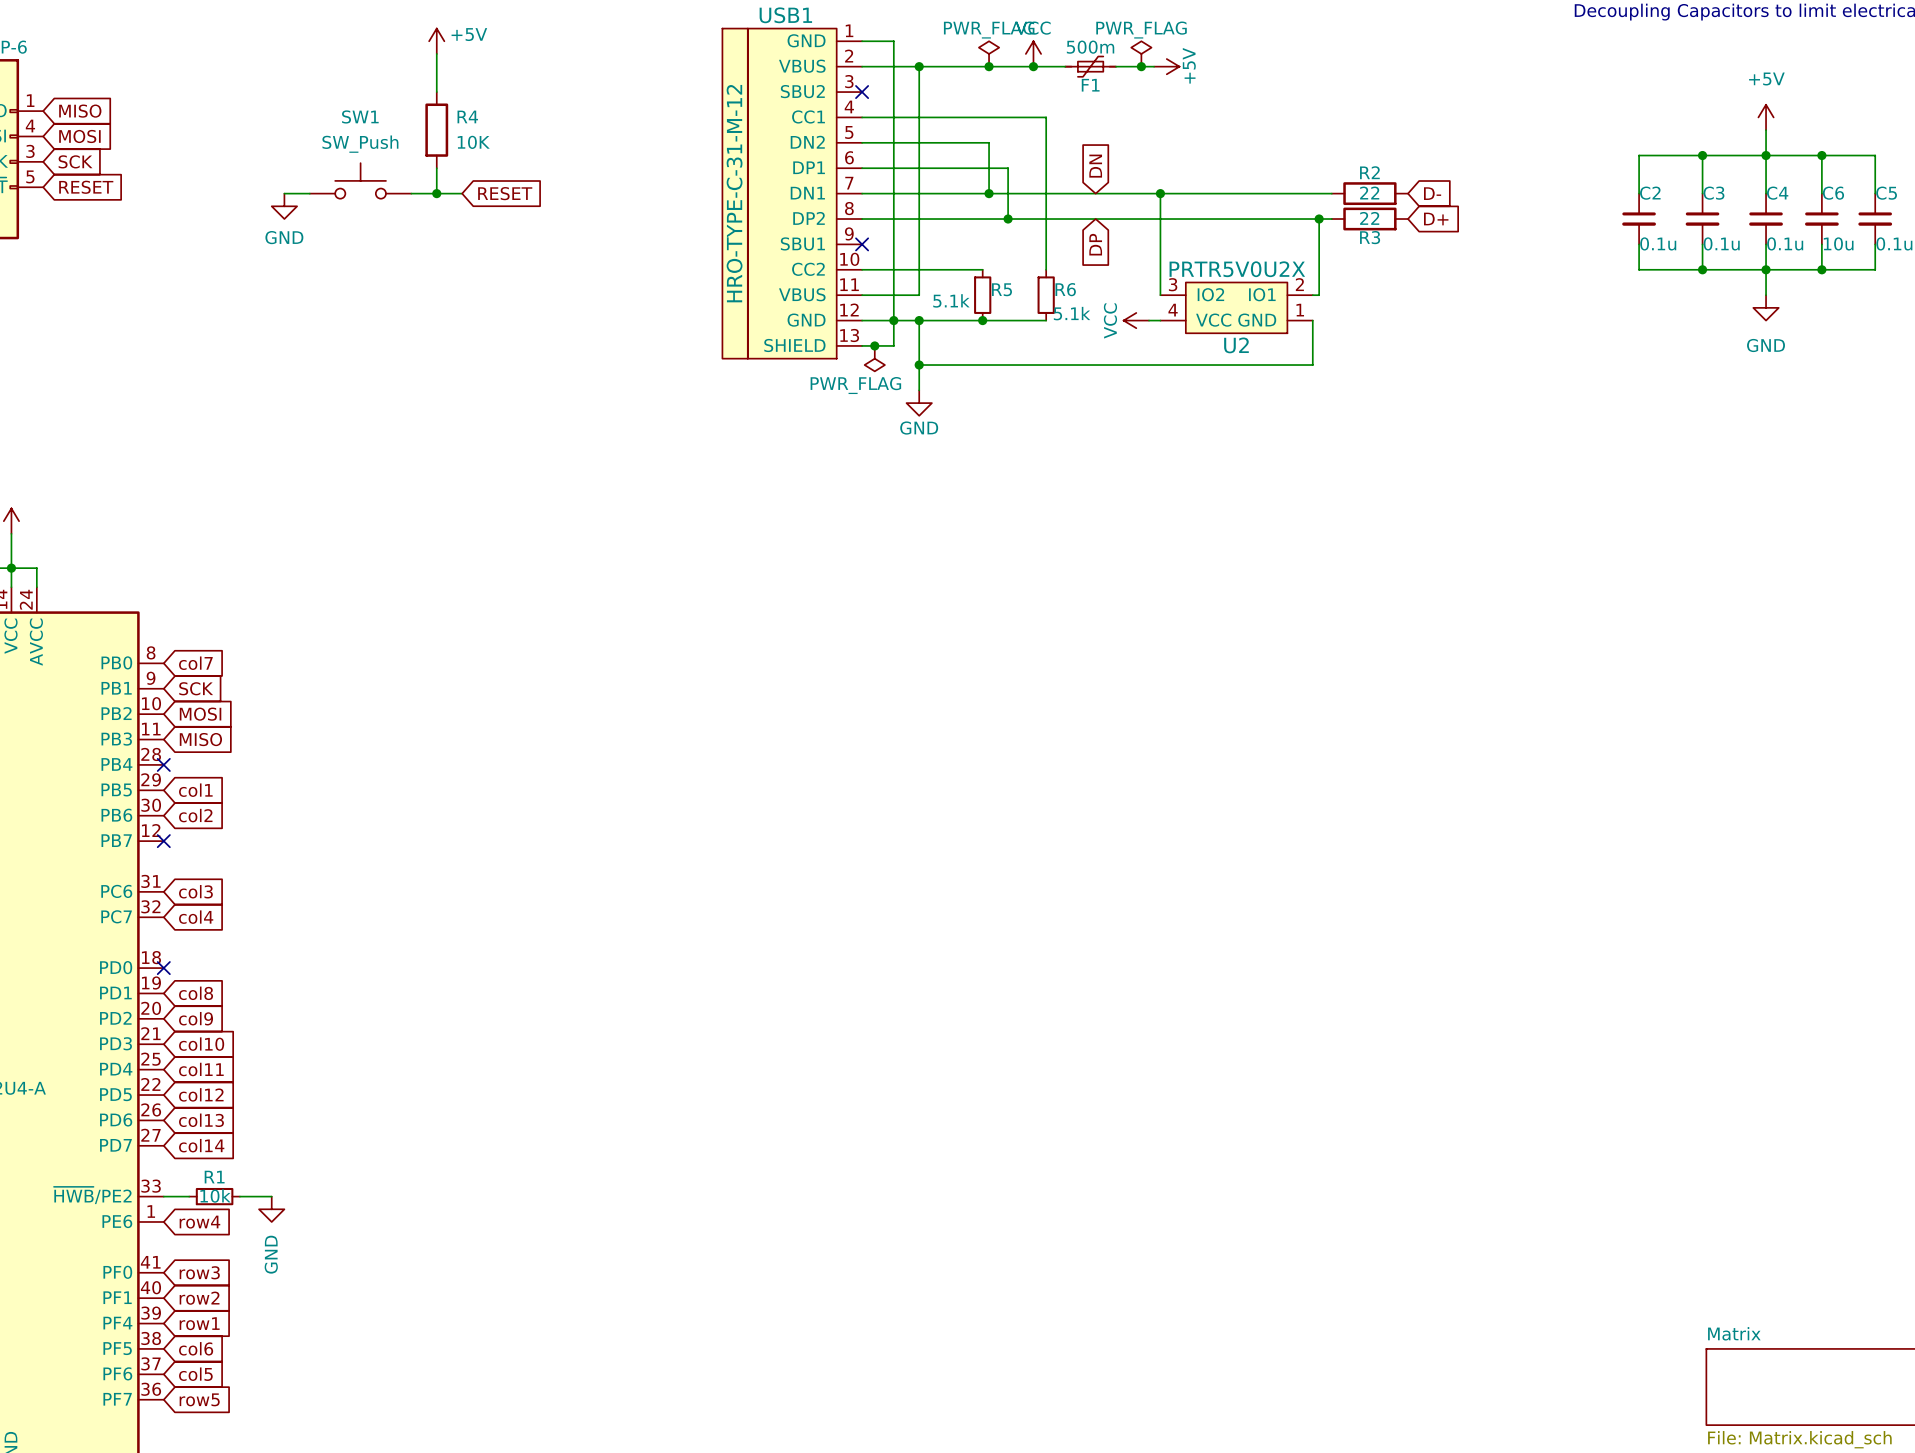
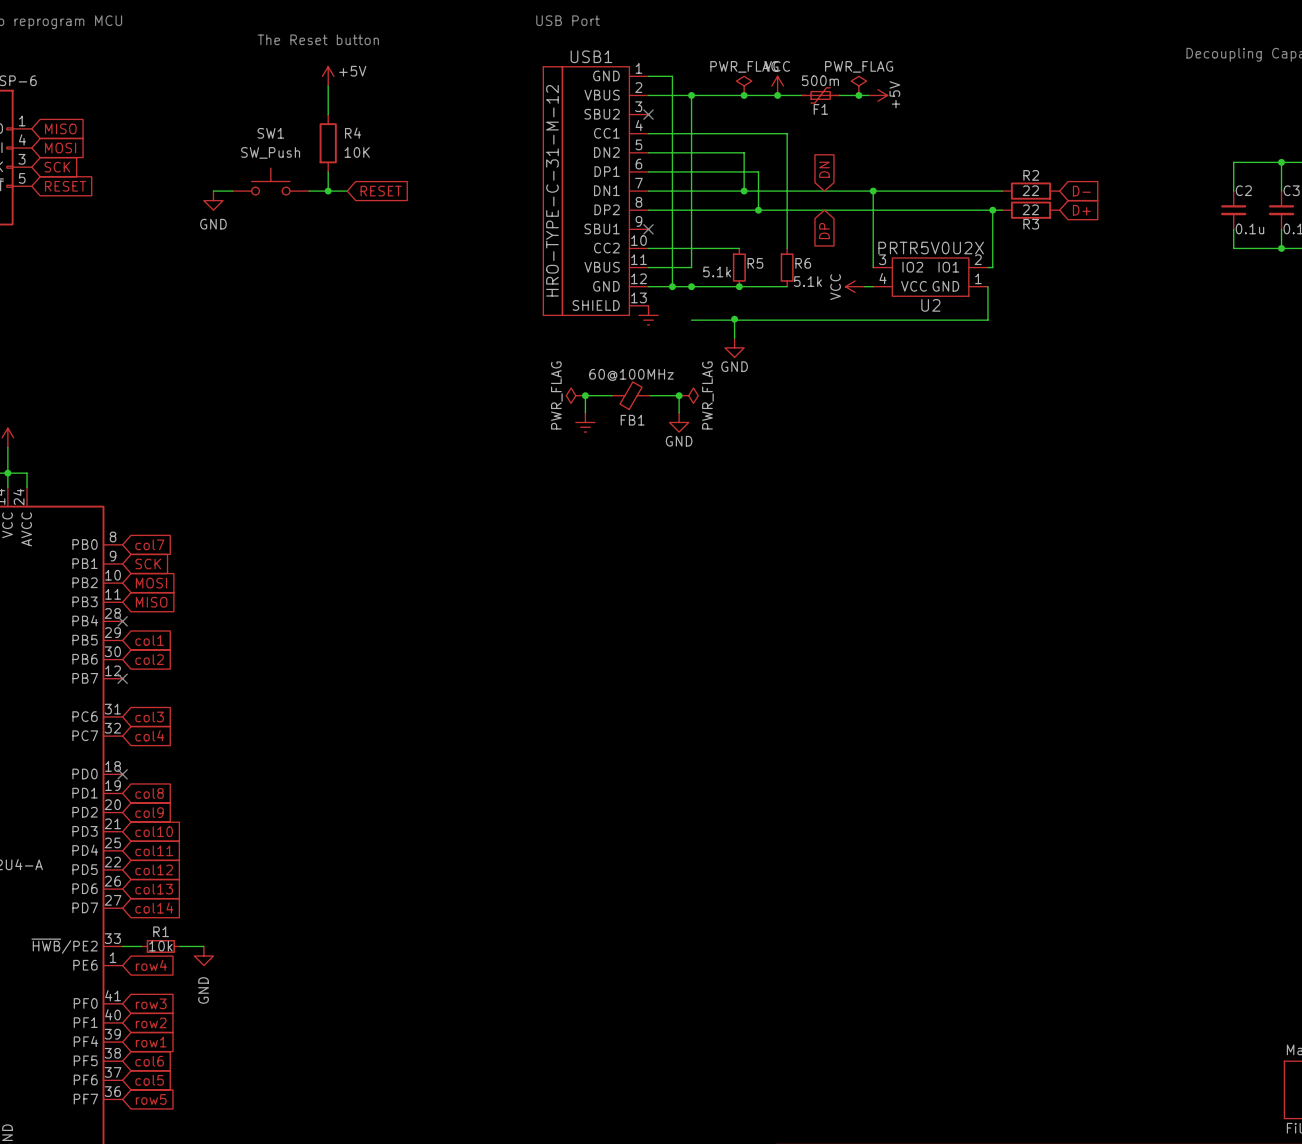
wire: (893, 320) (893, 345) (862, 345) -> none
wire: (919, 320) (919, 390) -> none
junction: (874, 345) -> none
power symbol: none -> (648, 315)
power symbol: PWR_FLAG (874, 358) -> none
wire: none -> (734, 319) (734, 338)
junction: none -> (734, 319)
junction: (919, 365) -> none
power symbol: none -> GND (734, 347)
power symbol: GND (919, 403) -> none
power symbol: none -> PWR_FLAG (575, 395)
junction: none -> (585, 395)
wire: none -> (612, 395) (585, 395) (585, 412)
FB1: none -> 60@100MHz (631, 395)
wire: none -> (650, 395) (679, 395) (679, 412)
junction: none -> (679, 395)
power symbol: none -> PWR_FLAG (688, 395)
power symbol: none -> (585, 422)
power symbol: none -> GND (679, 422)

